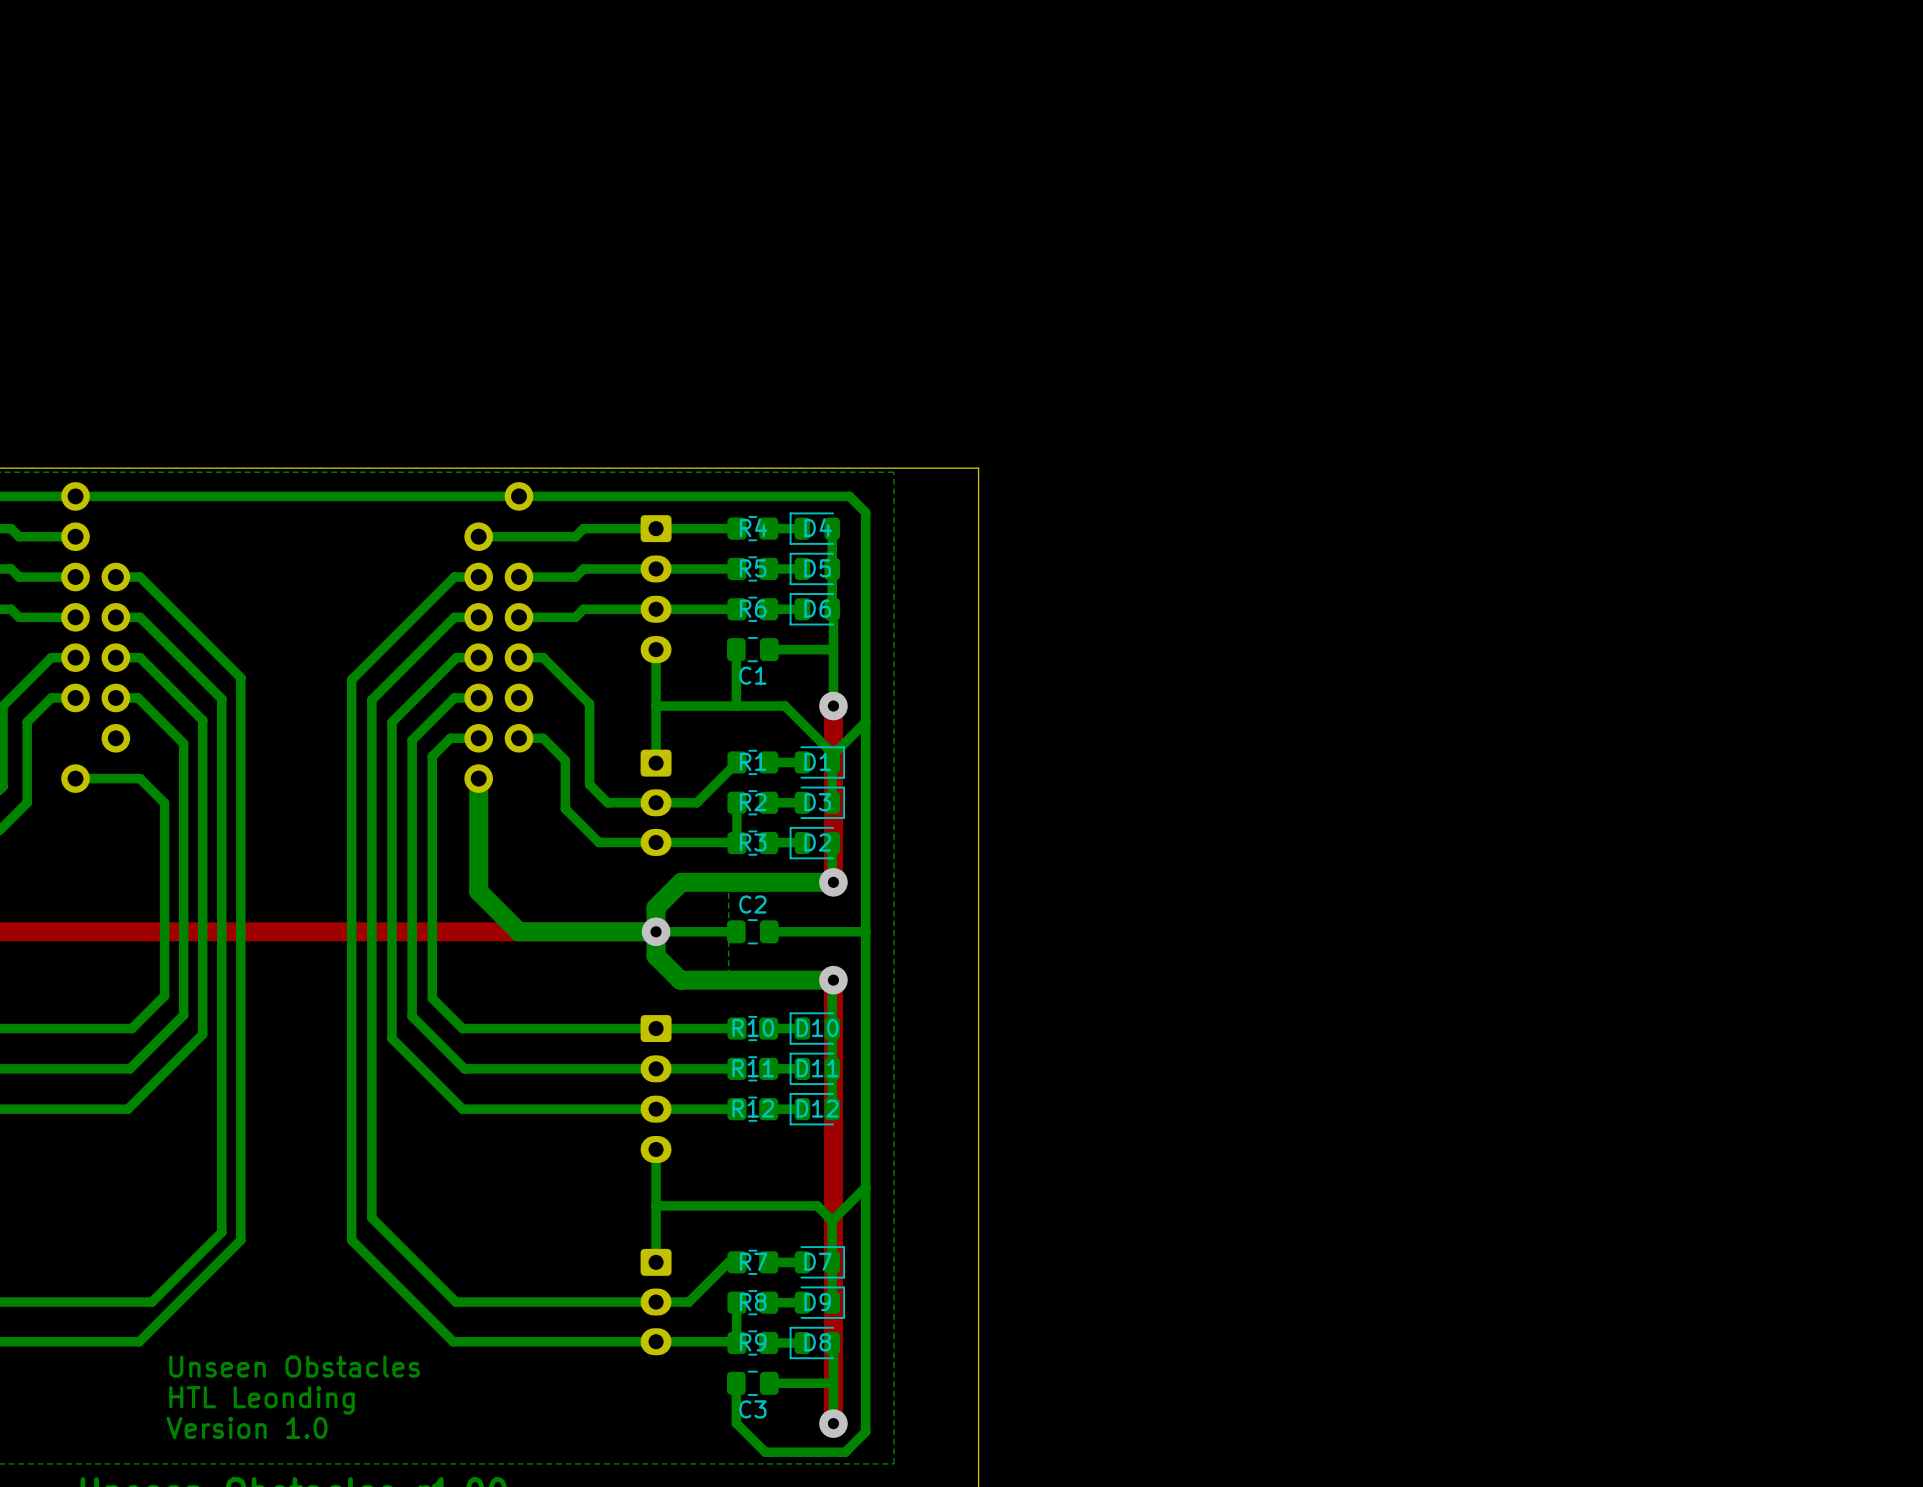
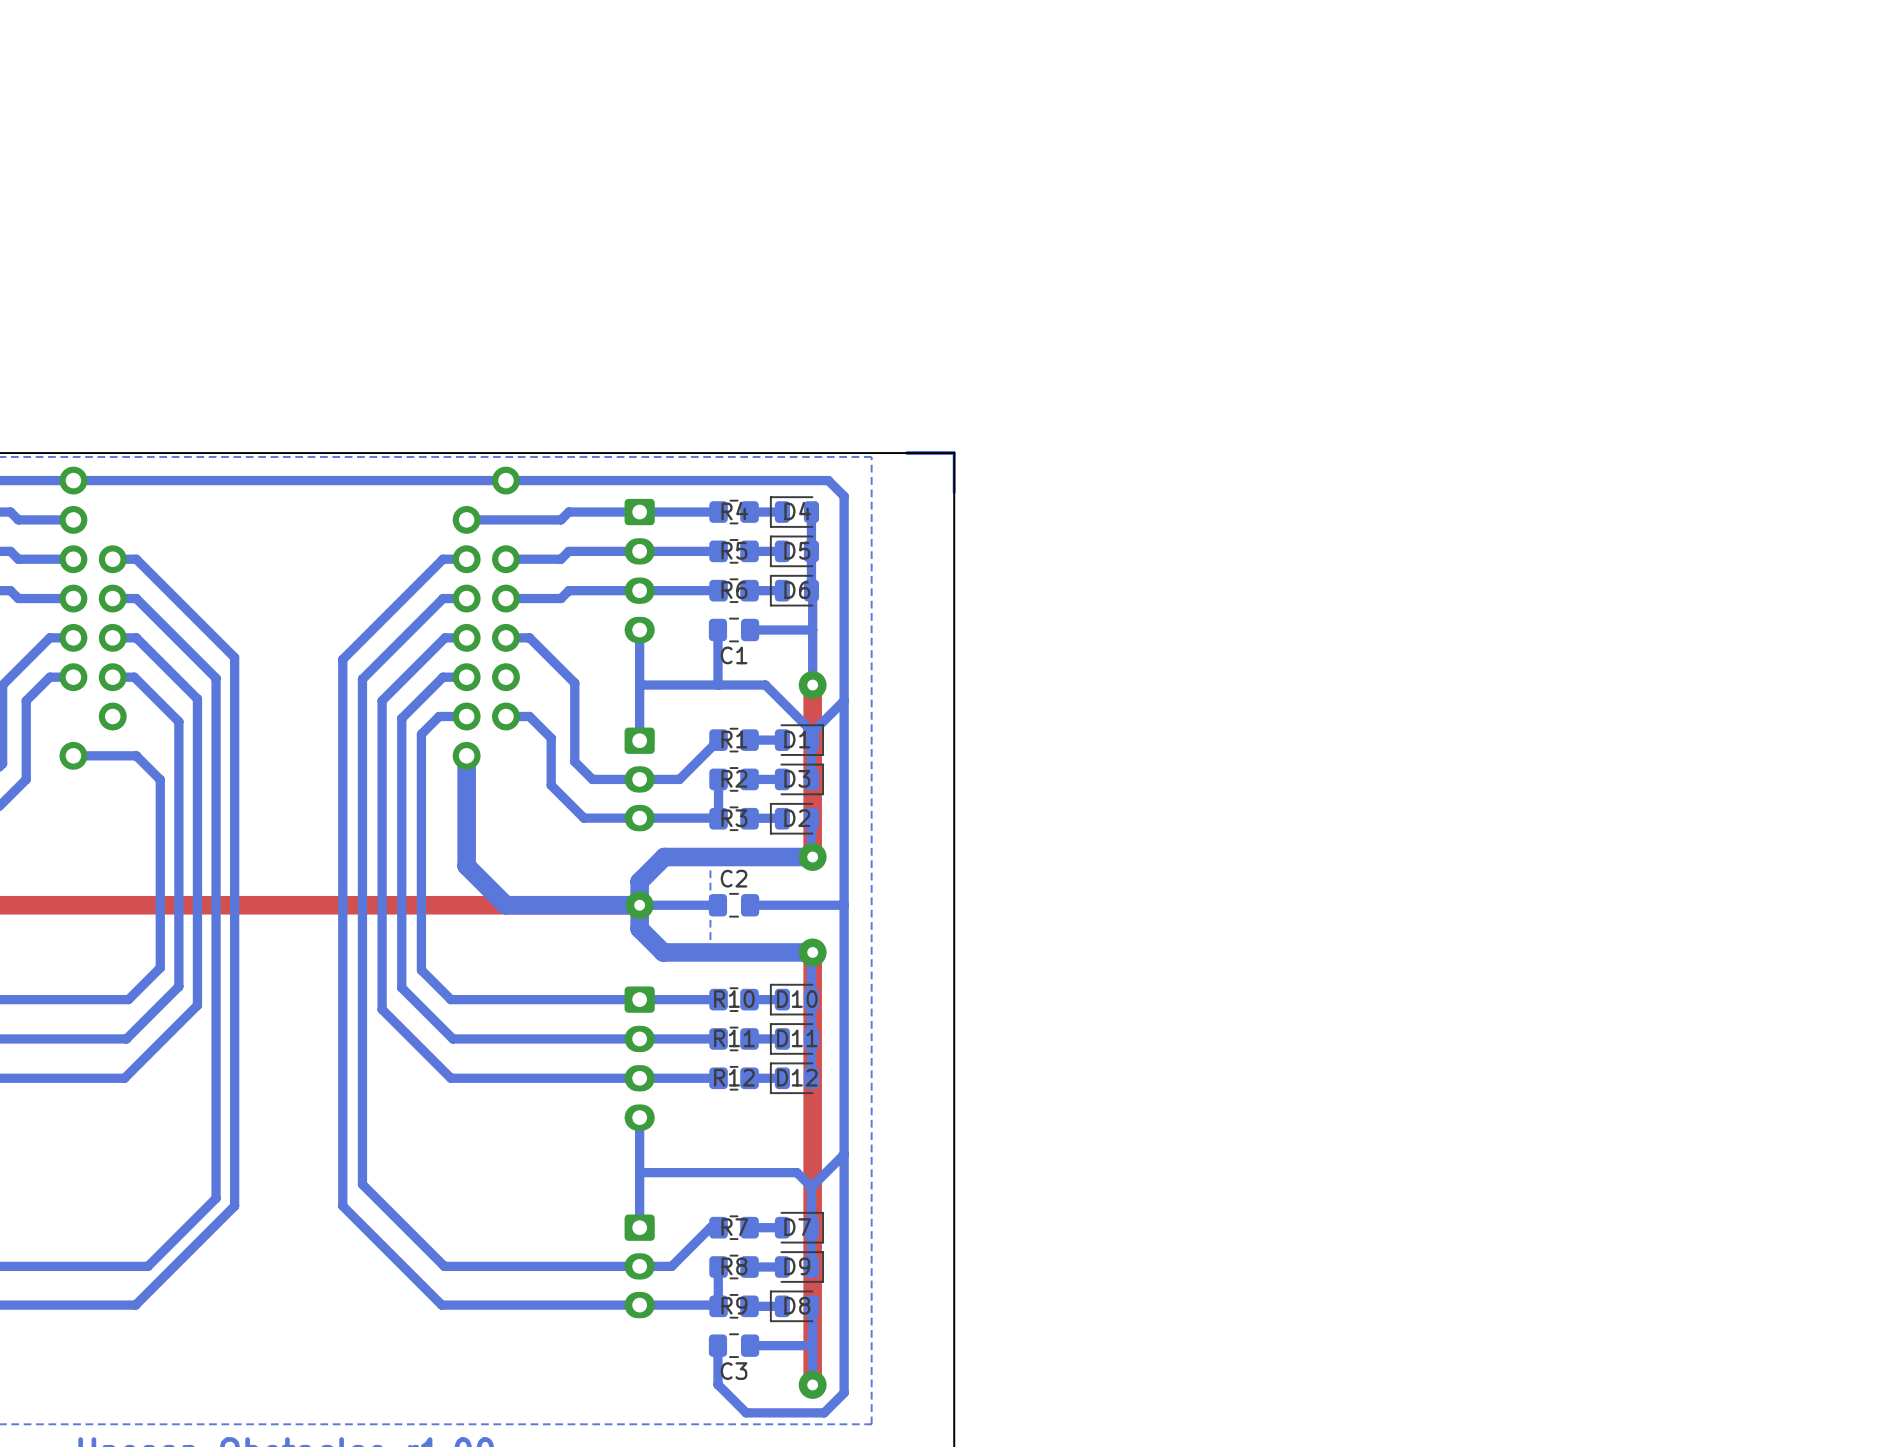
bottom track: none -> (907, 453) (954, 453) (954, 492)
text: Unseen Obstacles (294, 1366) -> none
text: HTL Leonding (262, 1400) -> none
text: Version 1.0 (247, 1427) -> none

